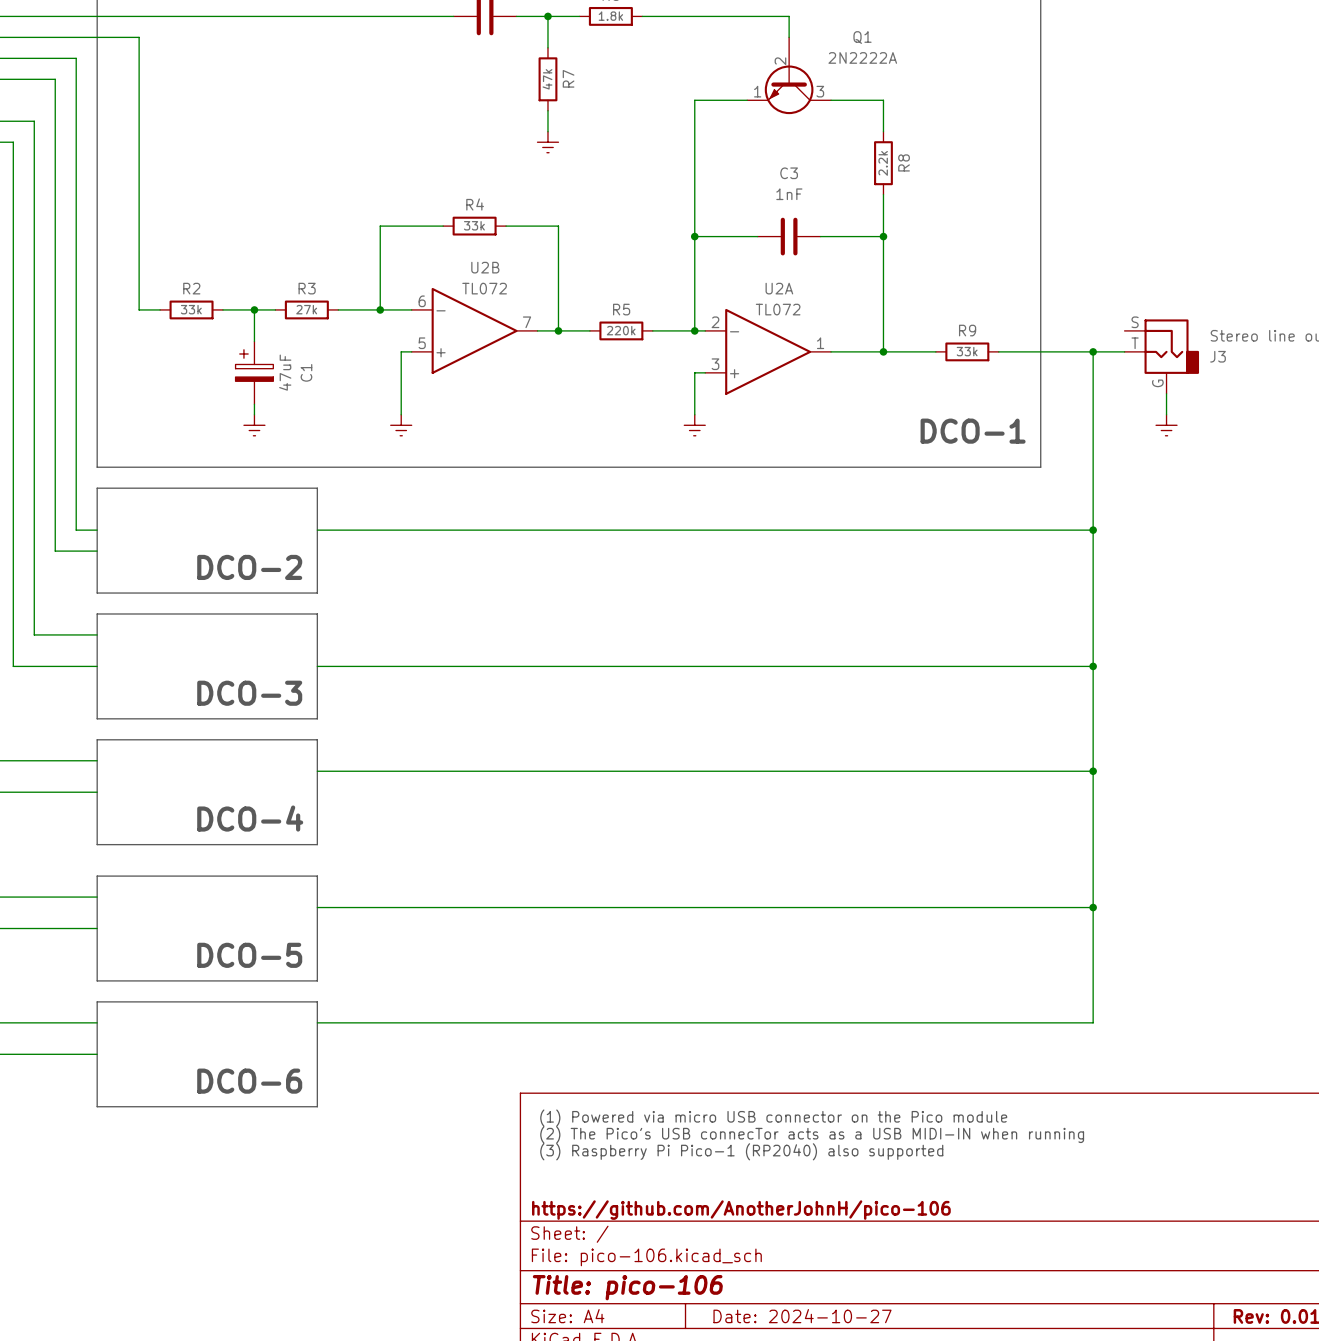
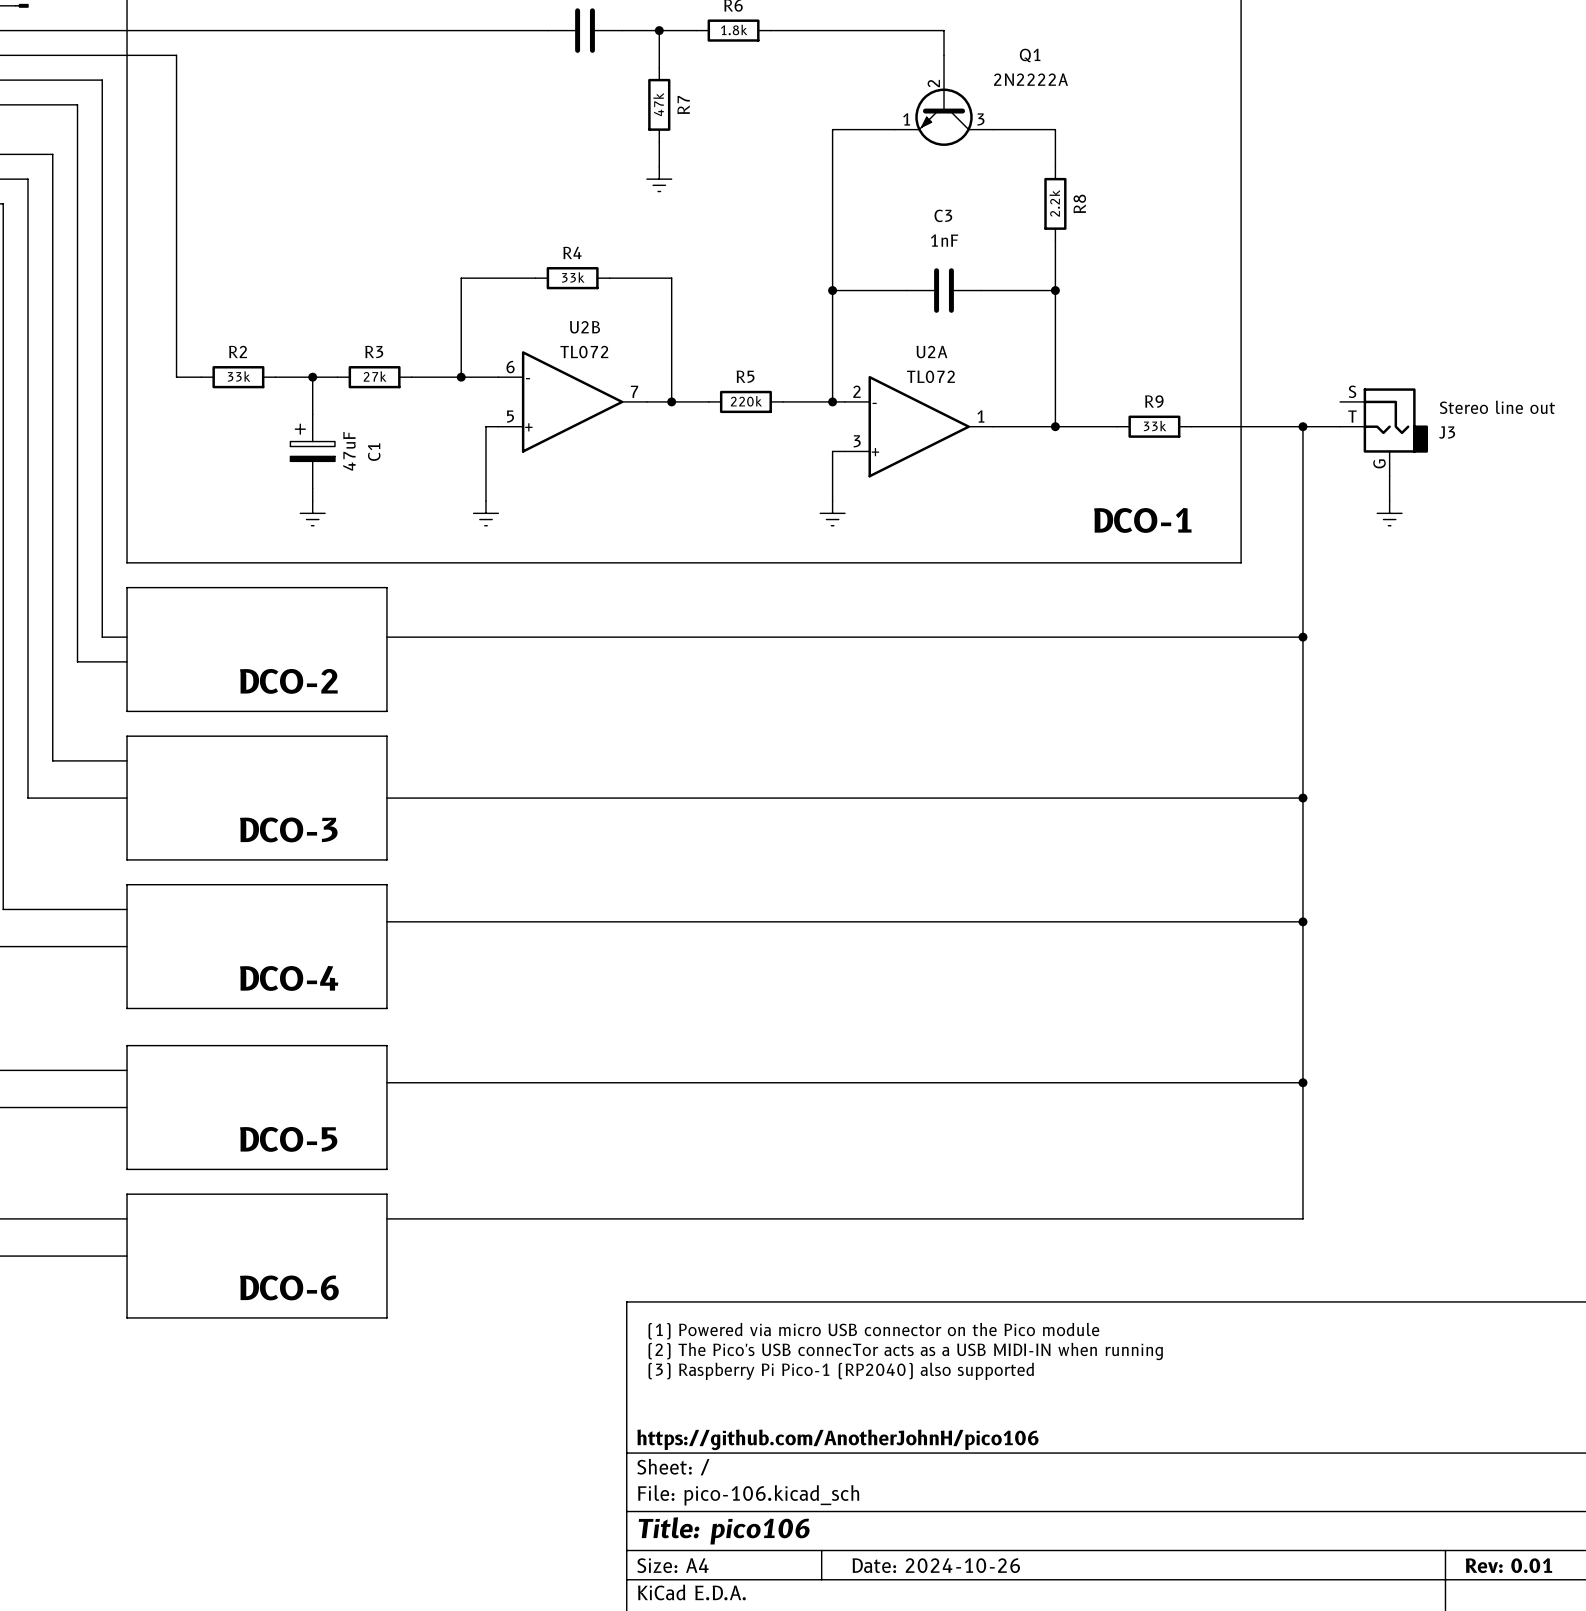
title block: https://github.com/AnotherJohnH/pico-106 (741, 1210) -> https://github.com/AnotherJohnH/pico106 (837, 1439)
title block: Title: pico-106 (627, 1287) -> Title: pico106 (724, 1530)
title block: Date: 2024-10-27 (802, 1316) -> Date: 2024-10-26 (936, 1565)

